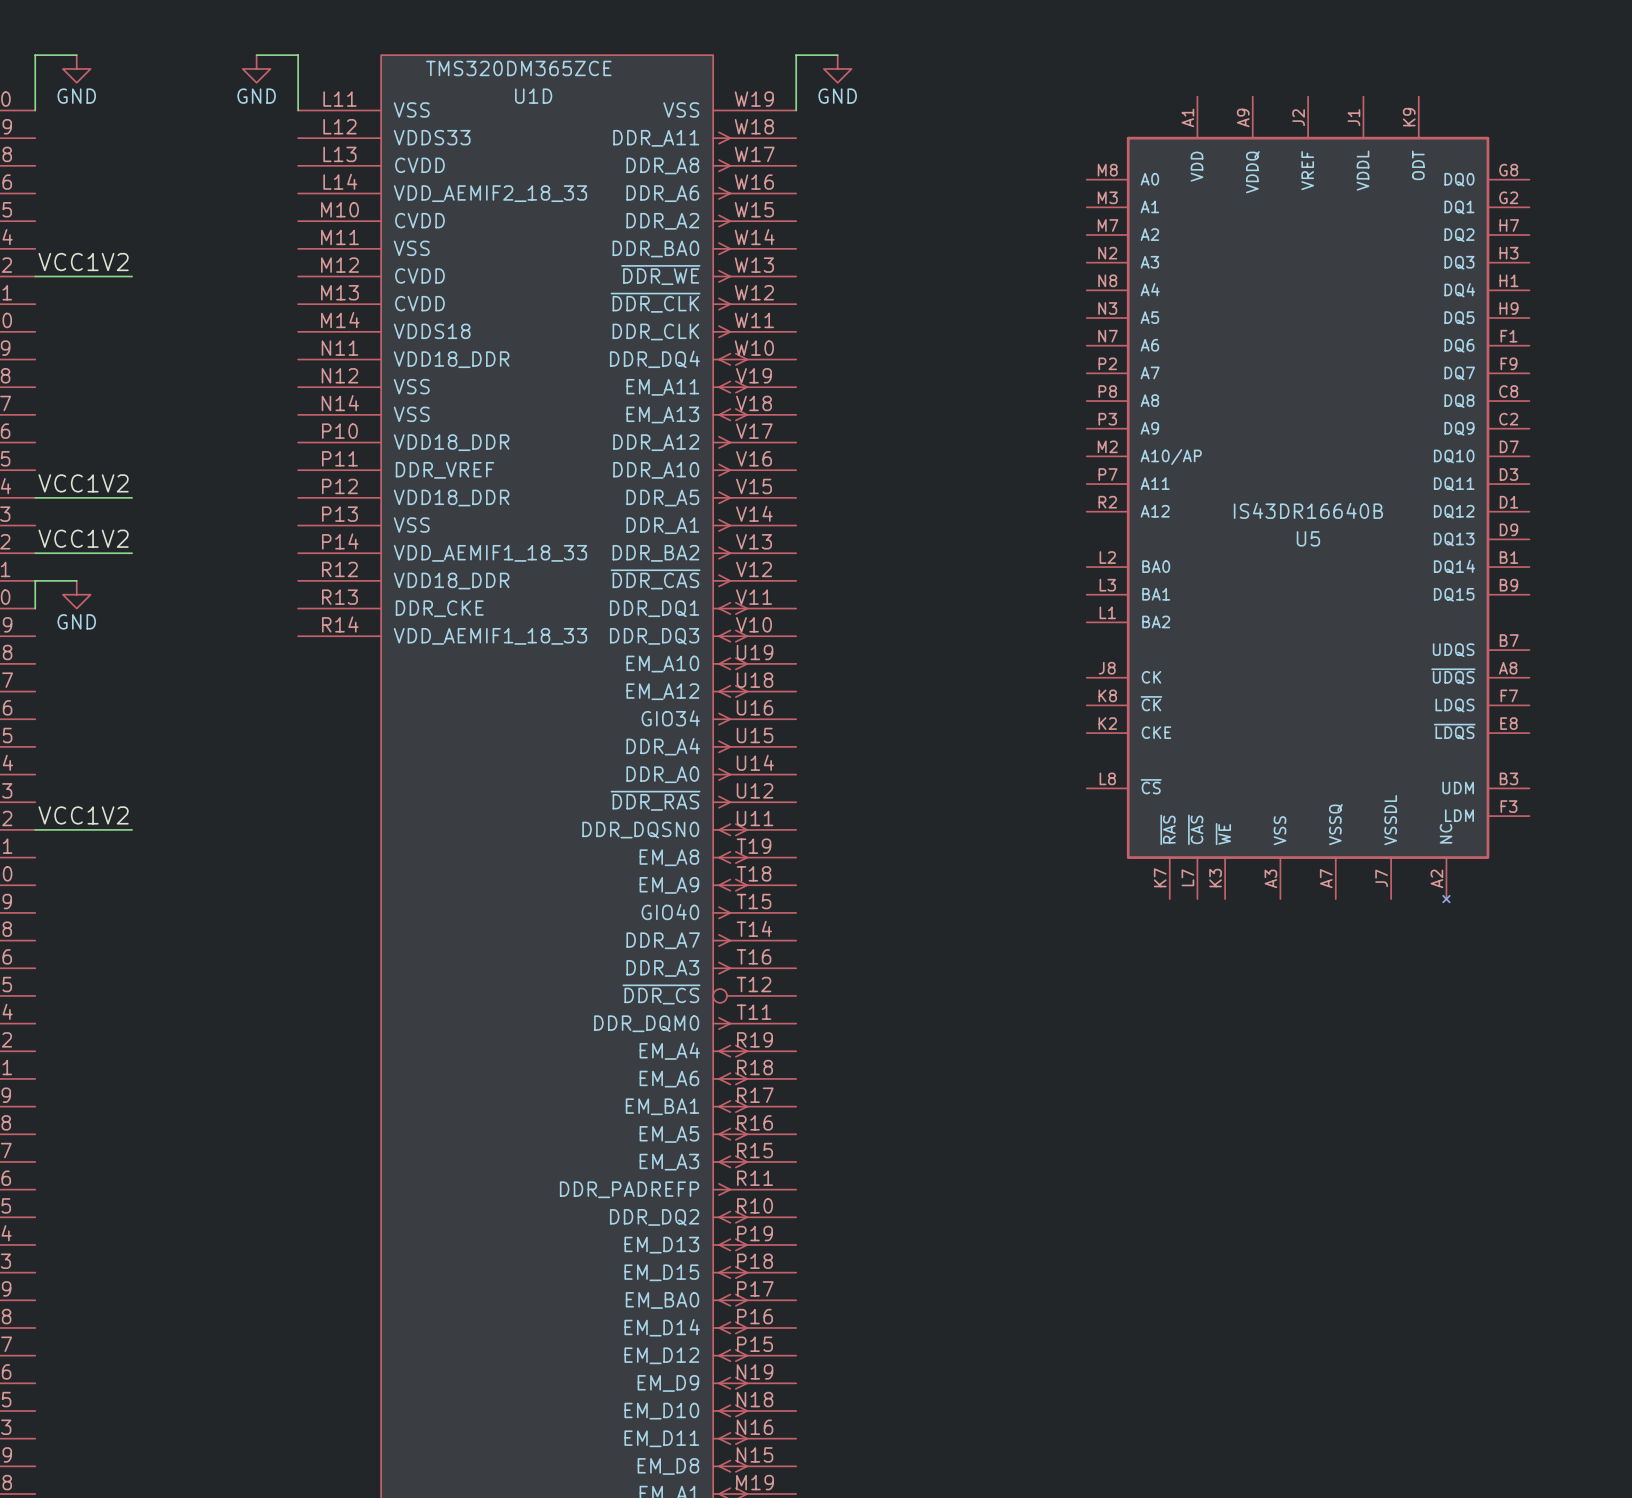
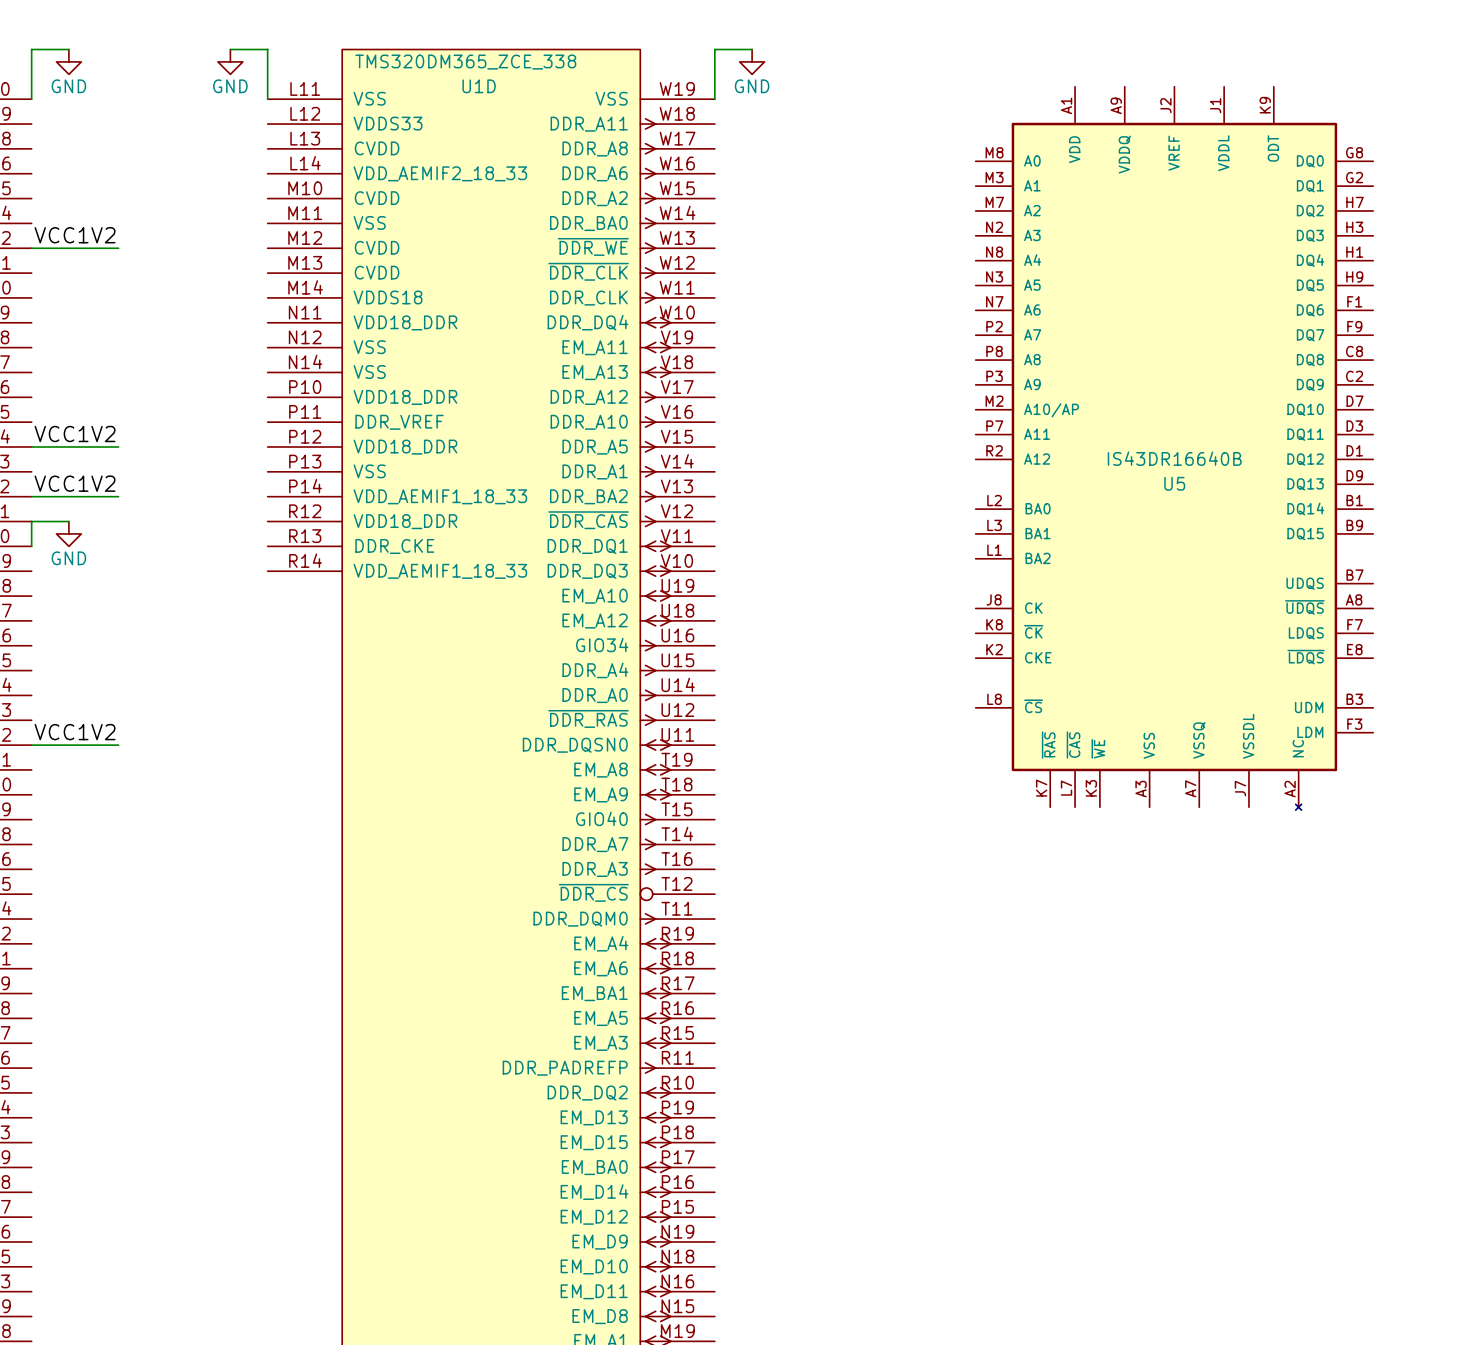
U1D value: TMS320DM365ZCE (518, 68) -> TMS320DM365_ZCE_338 (465, 62)

